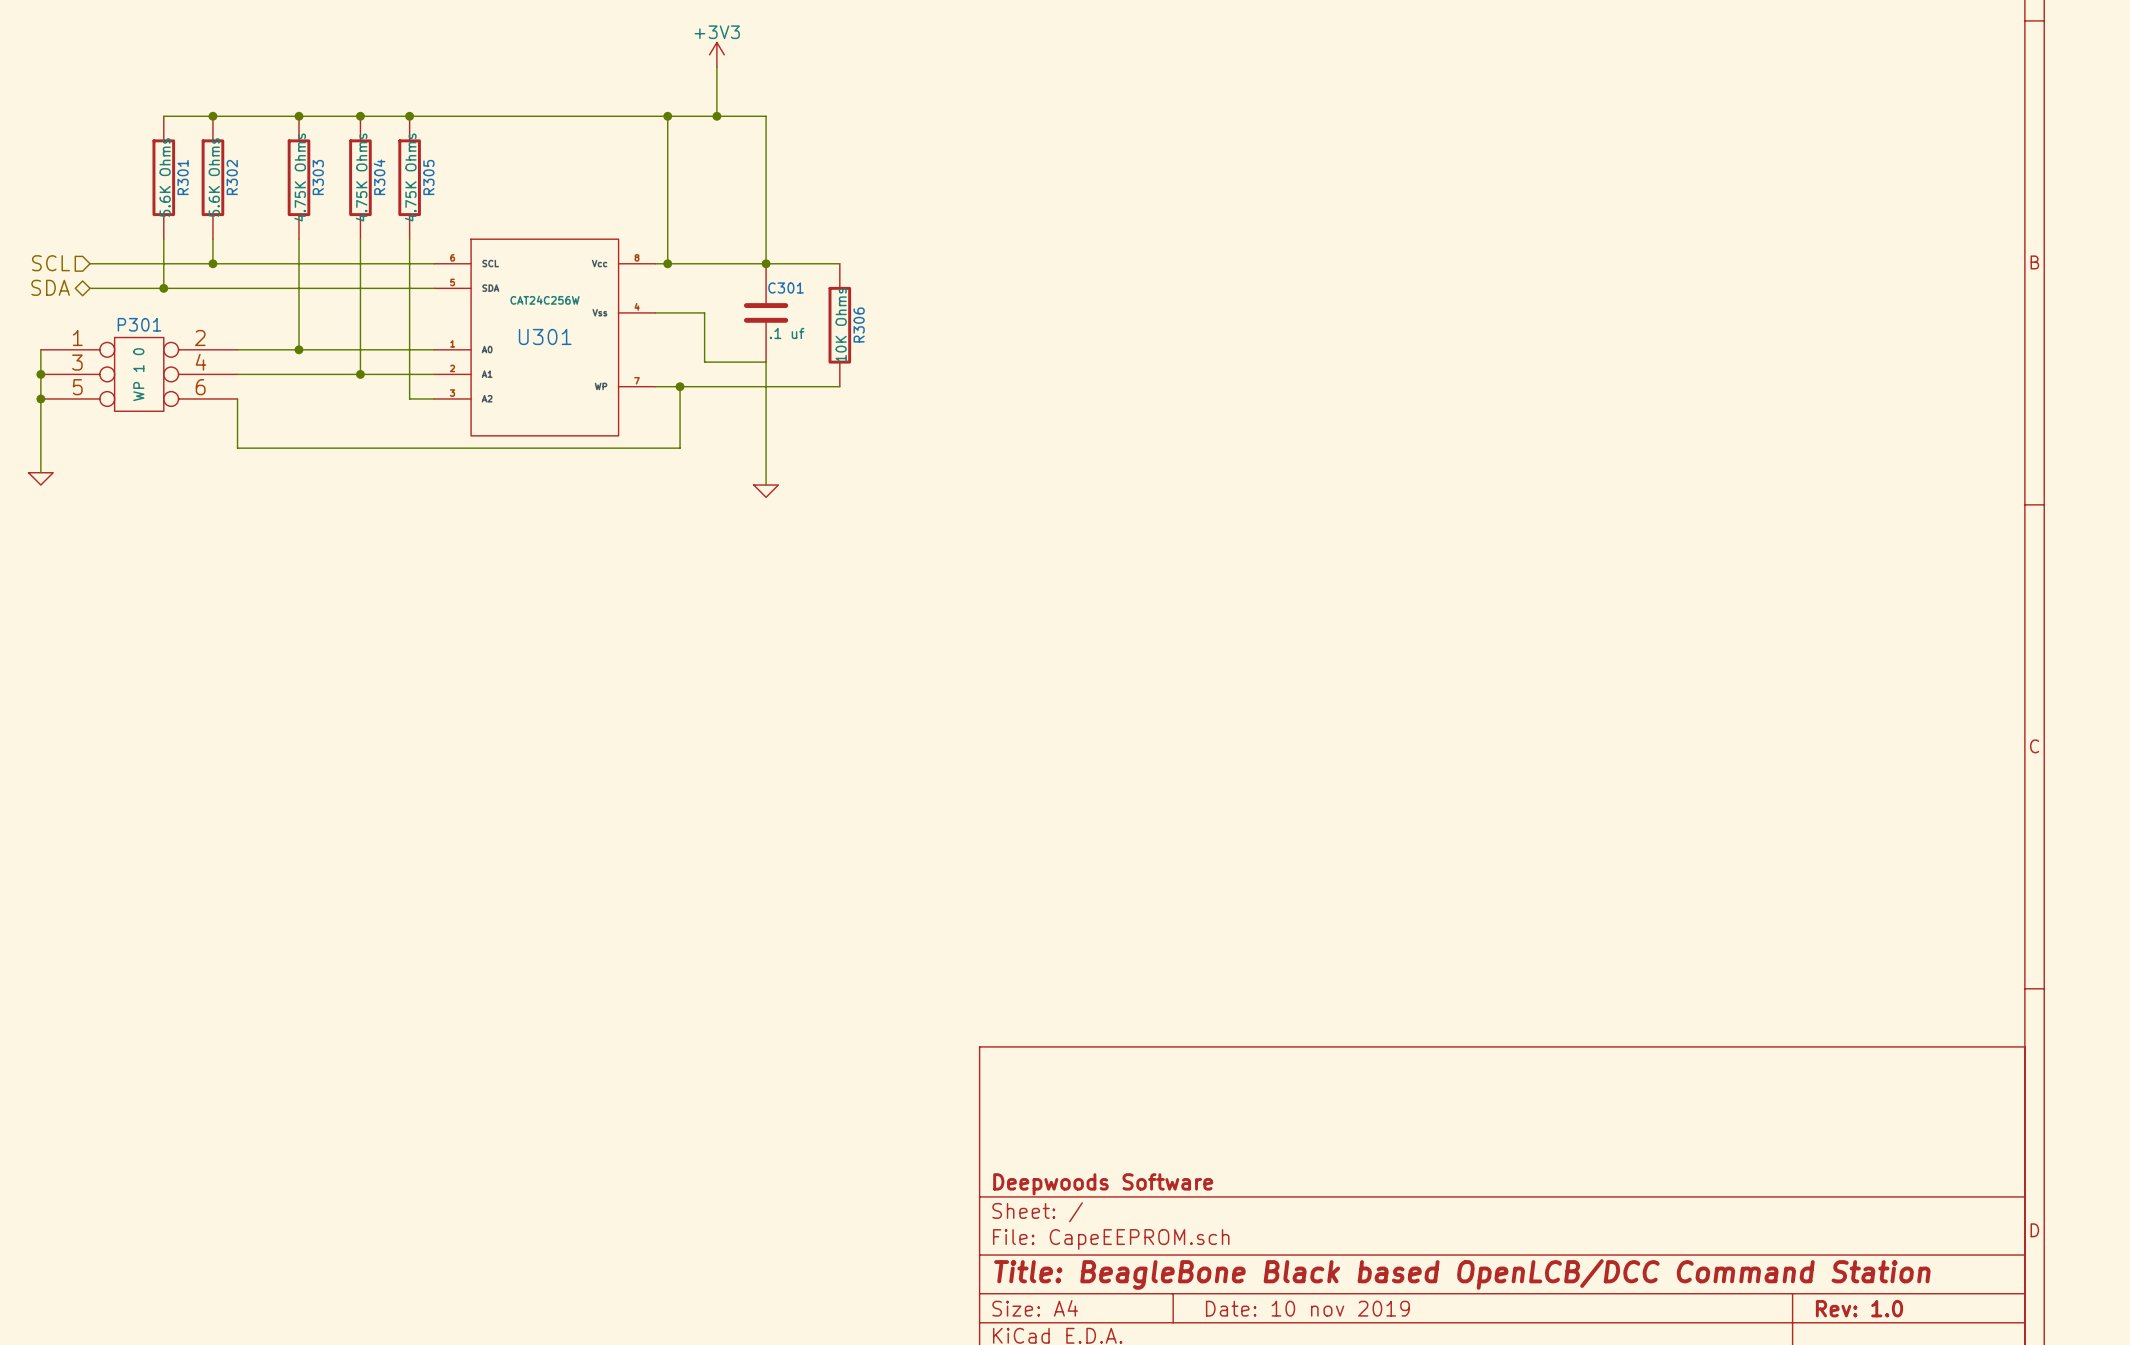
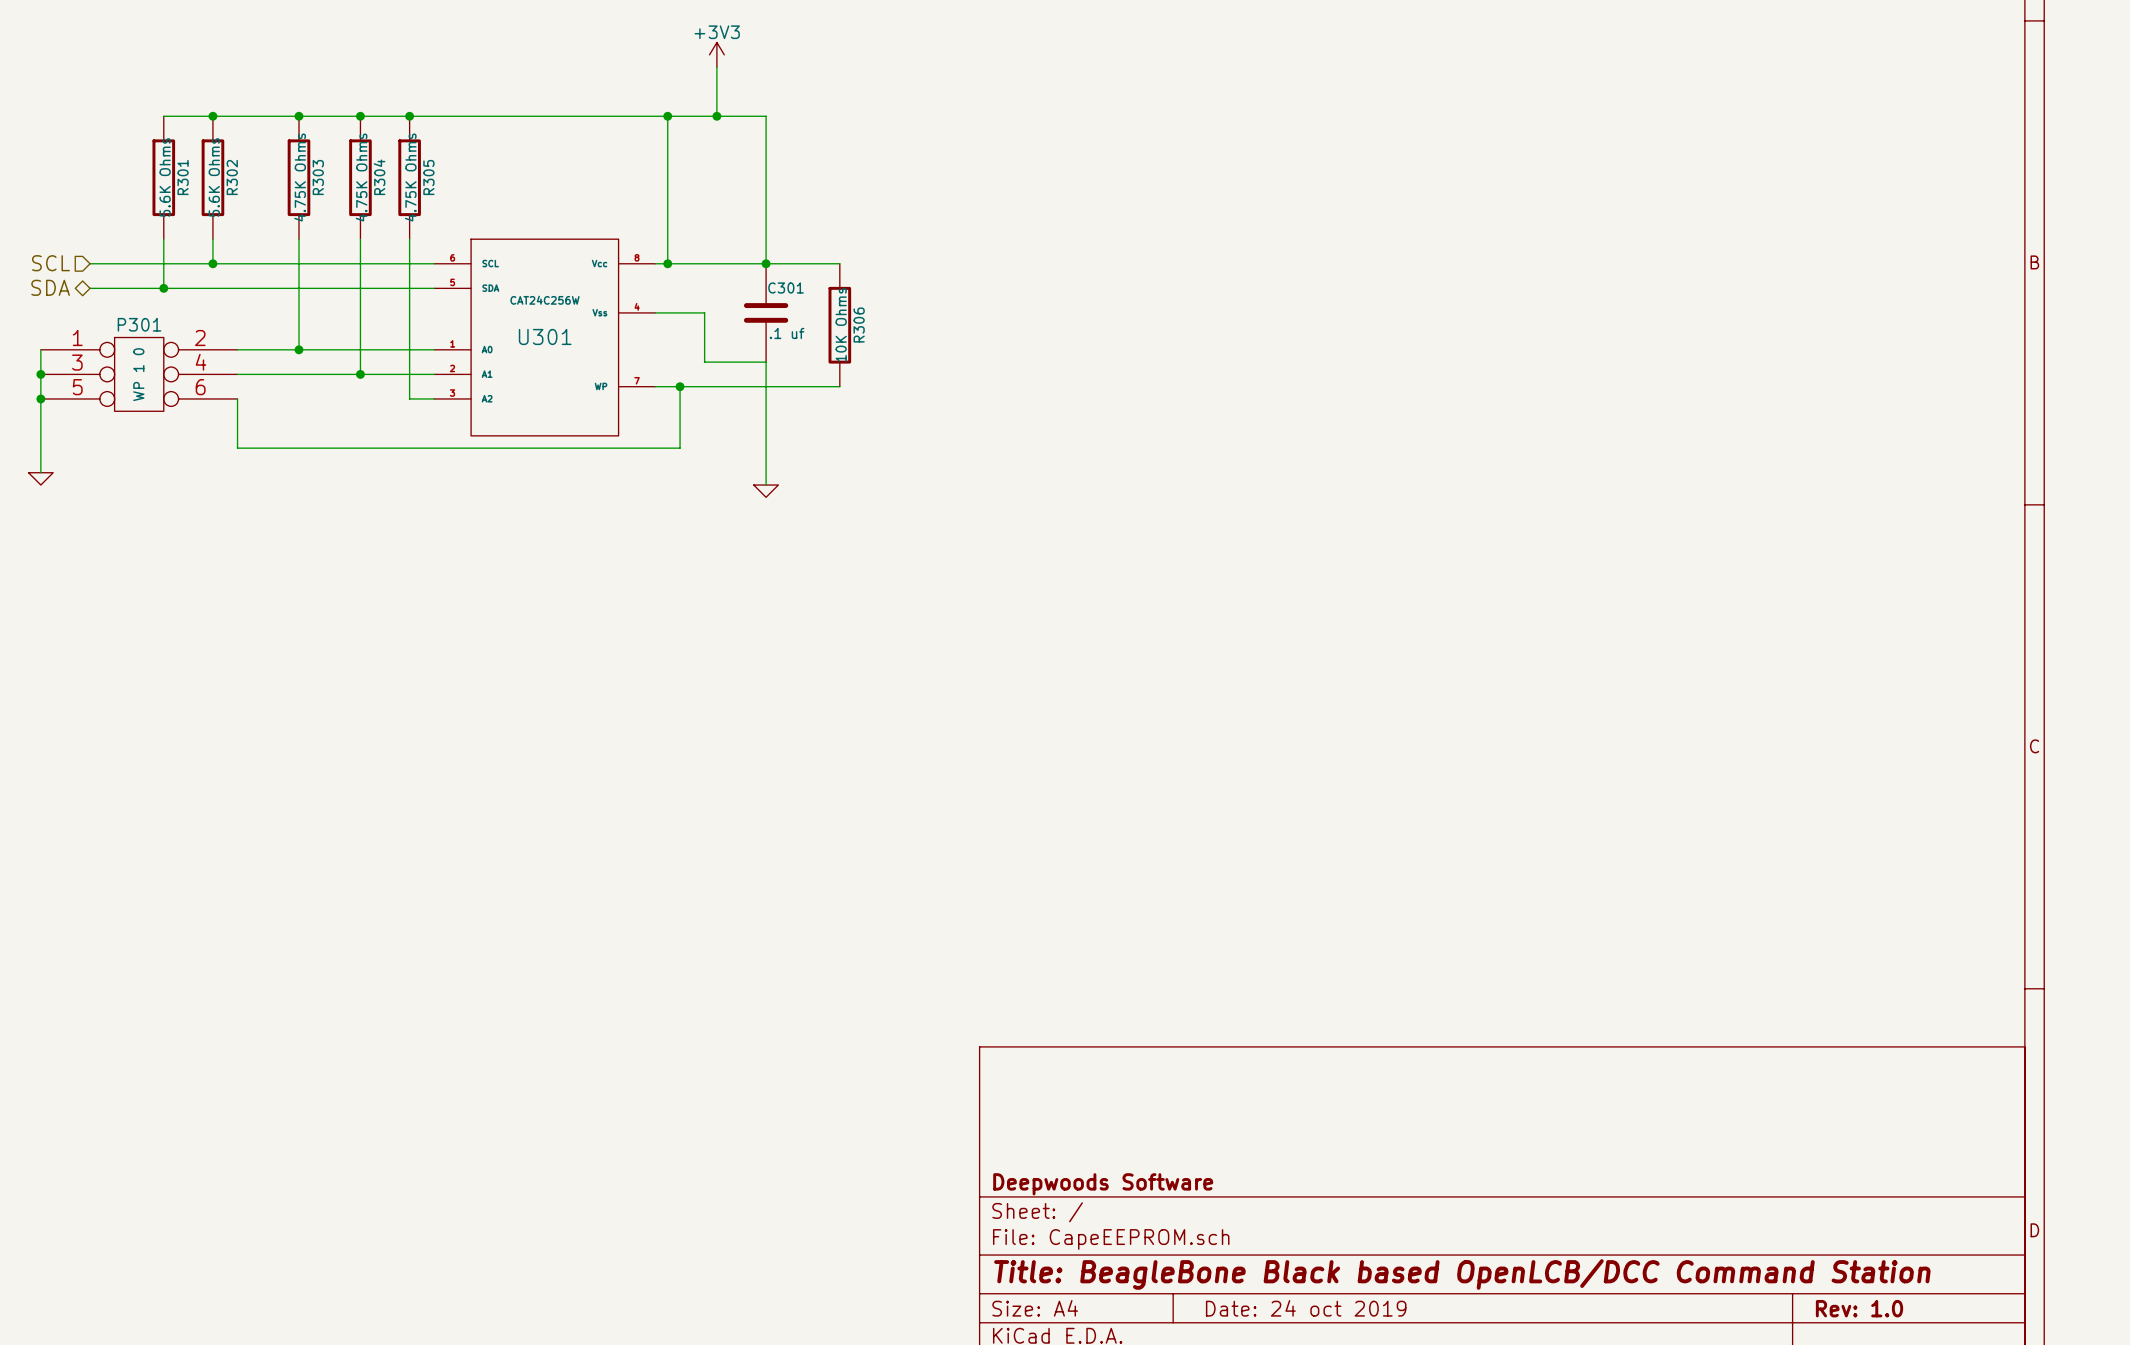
title block: Date: 10 nov 2019 (1307, 1308) -> Date: 24 oct 2019 (1306, 1308)

